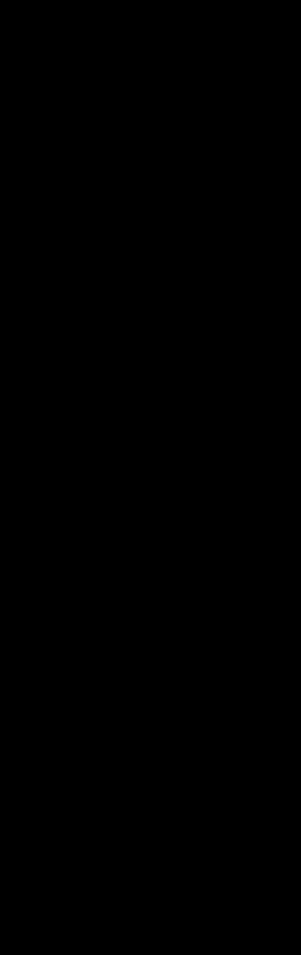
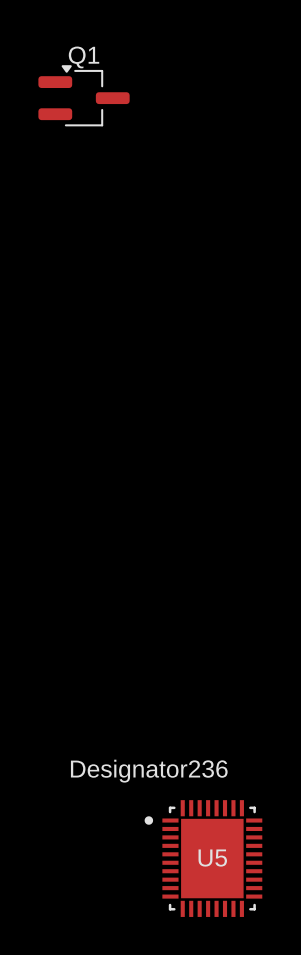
Q1: none -> (84, 95)
U5: none -> (203, 858)

